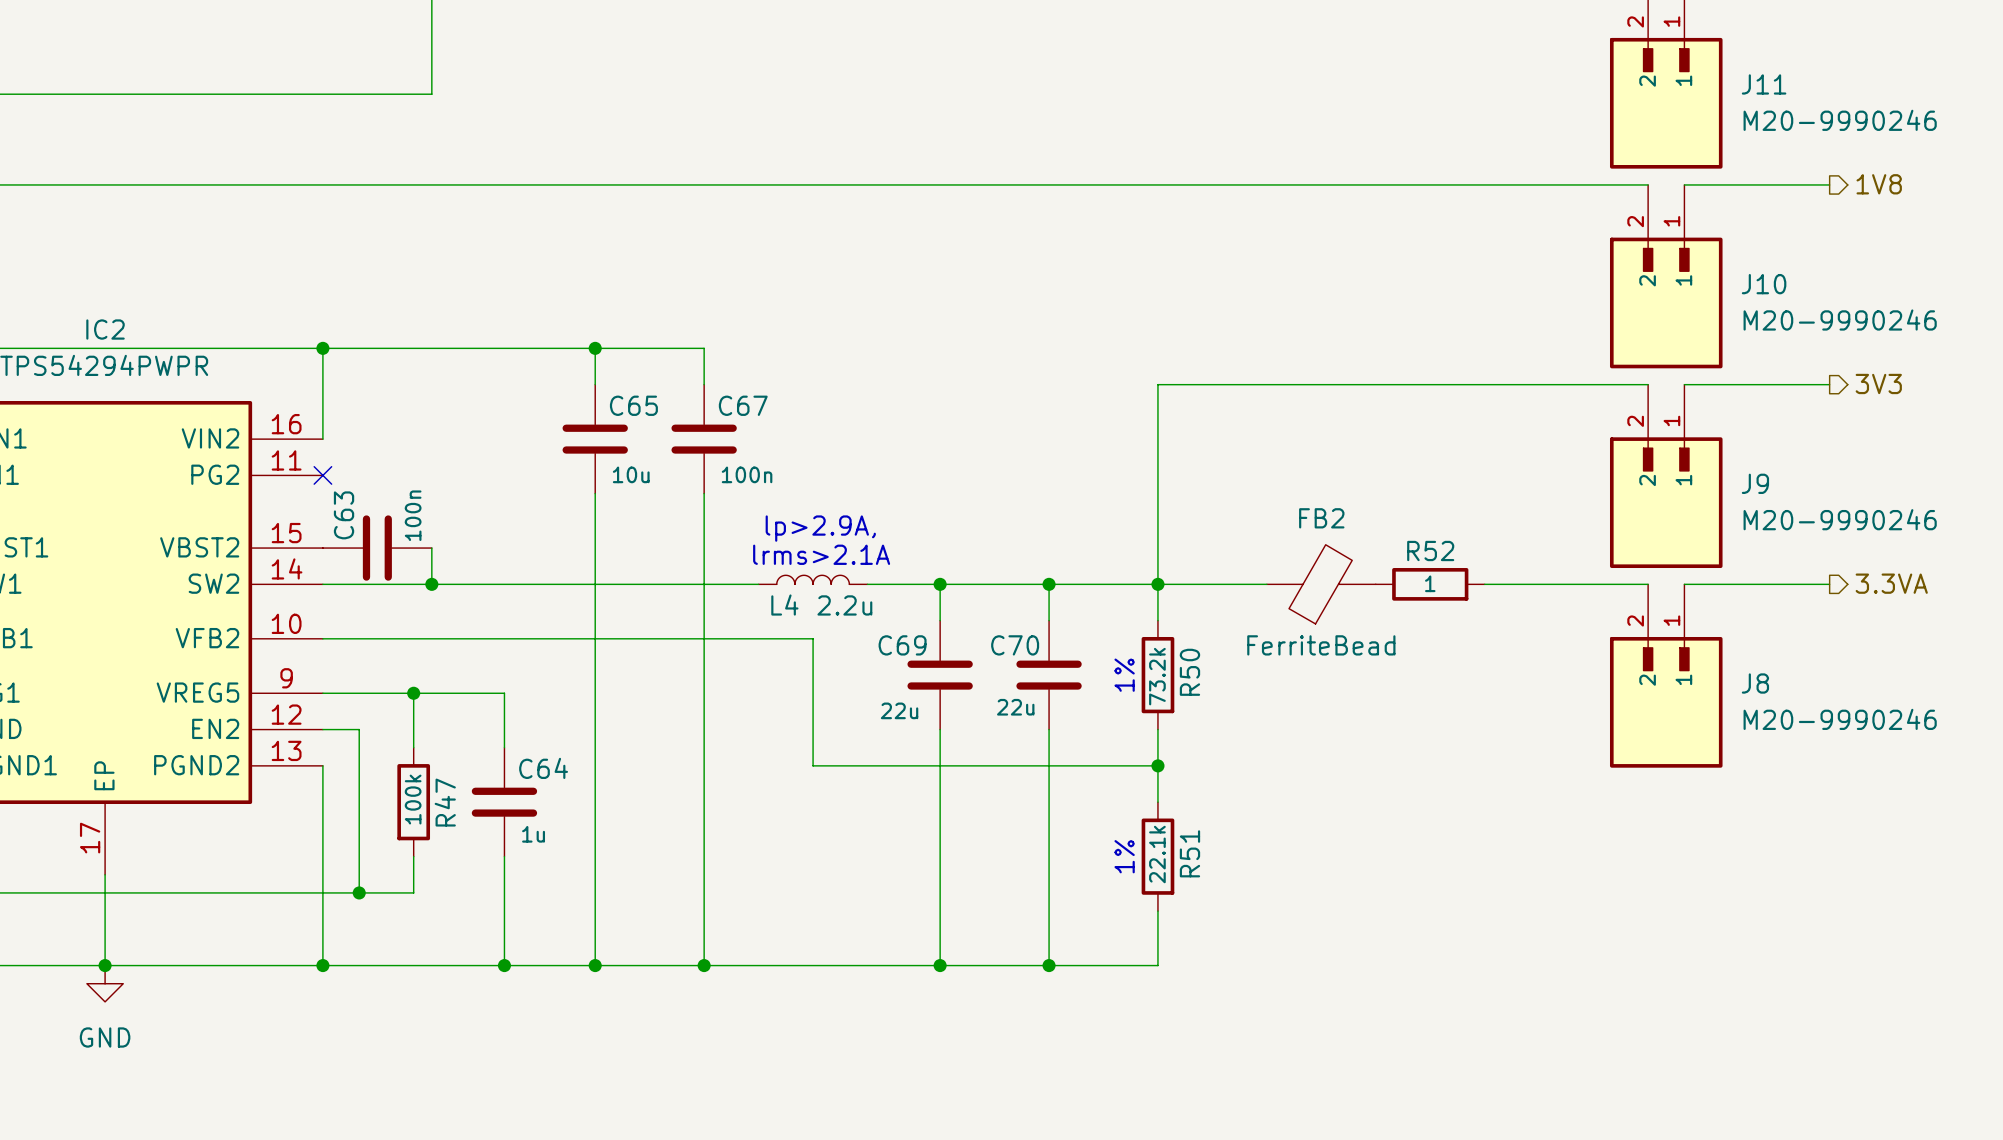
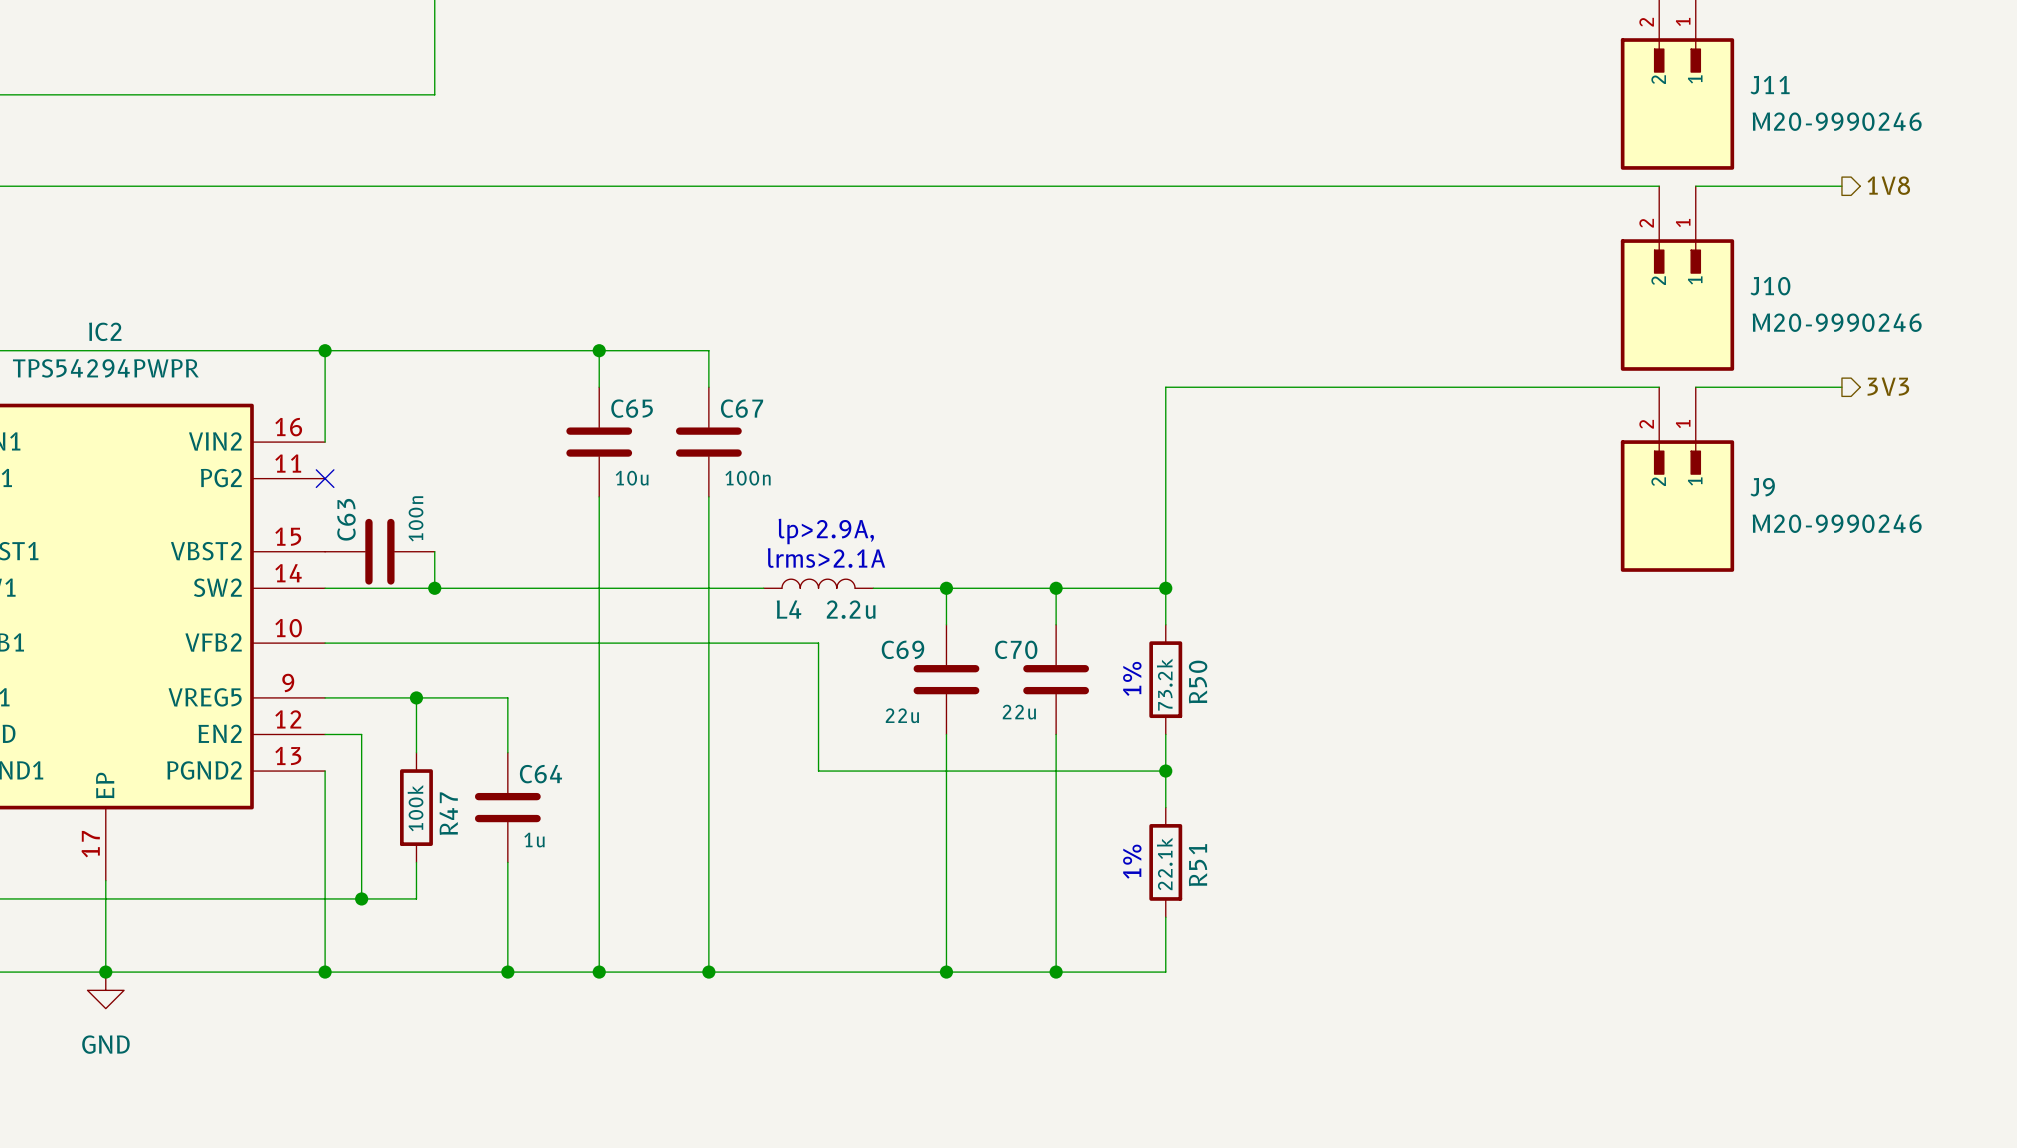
hierarchical label: 3.3VA (1891, 583) -> none
wire: (1157, 584) (1266, 584) -> none
FB2: FerriteBead (1321, 584) -> none
R52: 1 (1430, 584) -> none
wire: (1484, 584) (1648, 584) -> none
wire: (1684, 584) (1829, 584) -> none
J8: M20-9990246 (1666, 676) -> none

